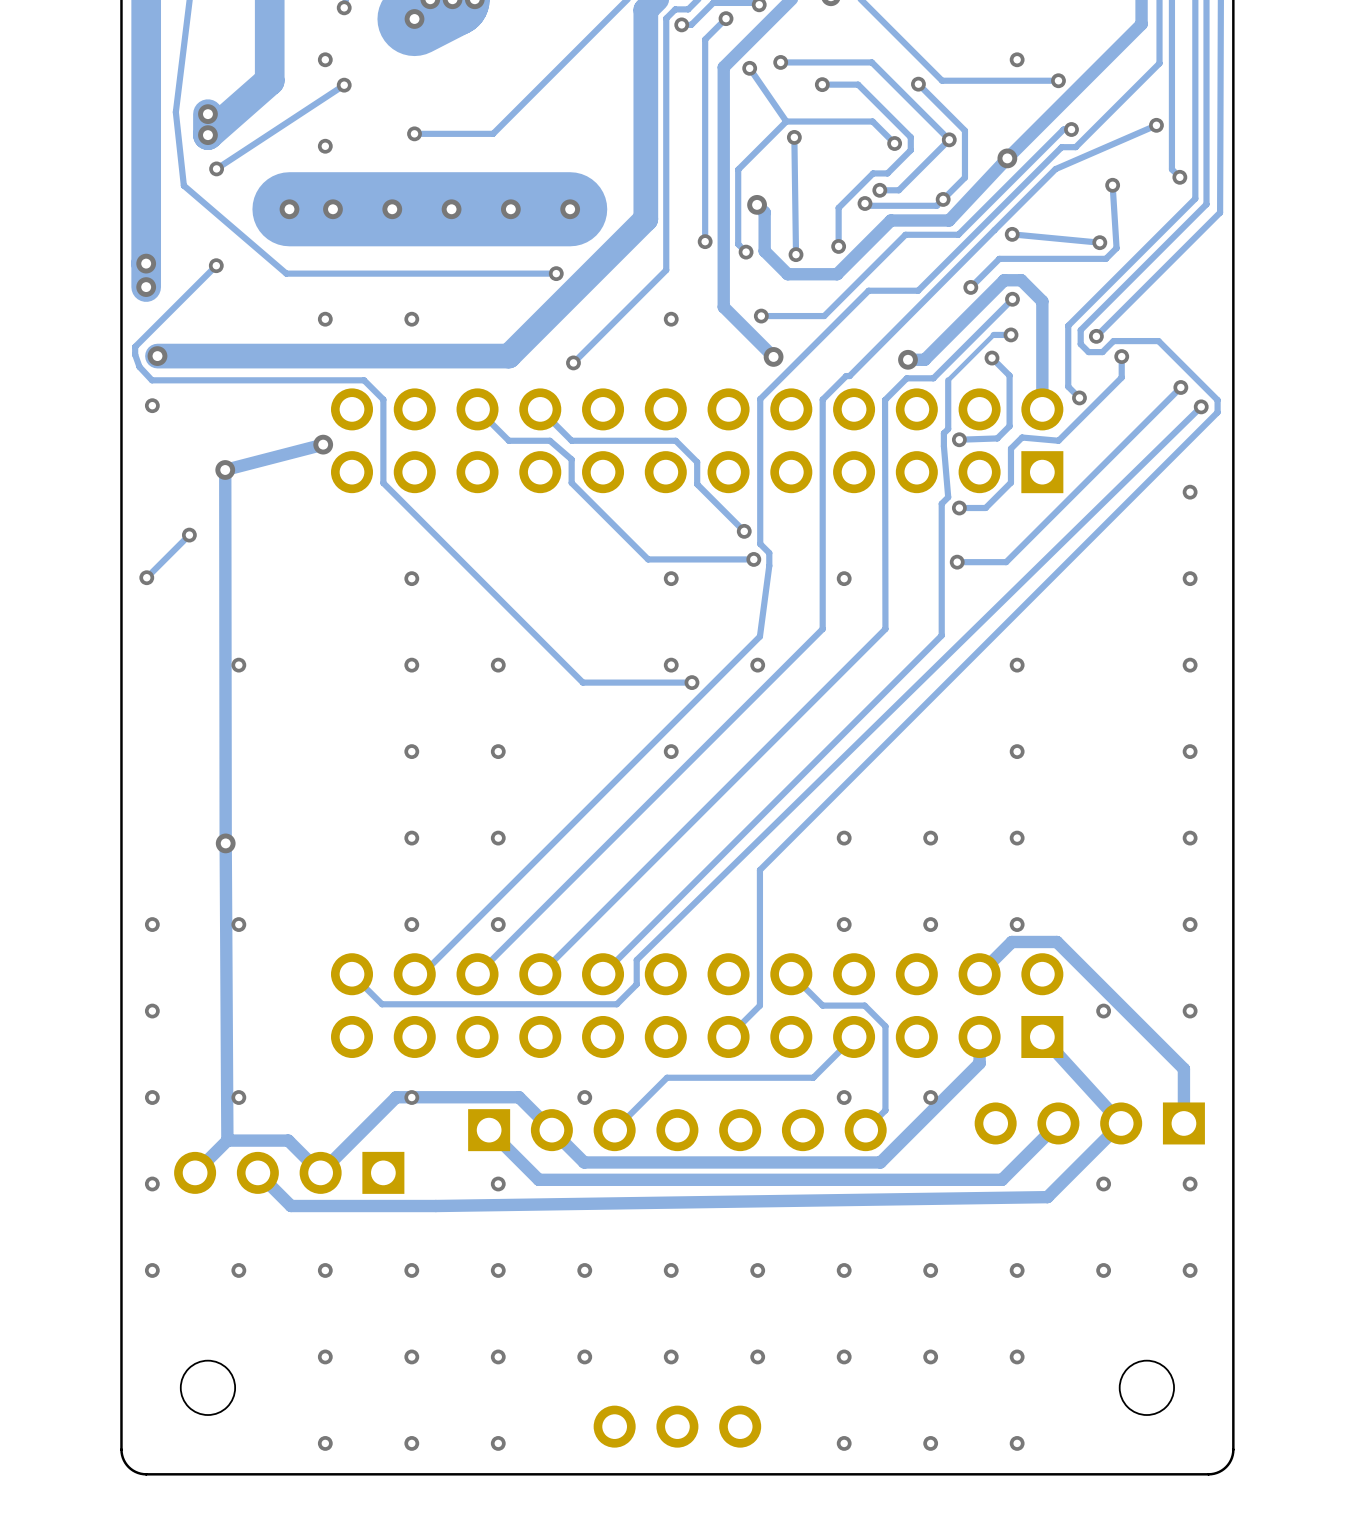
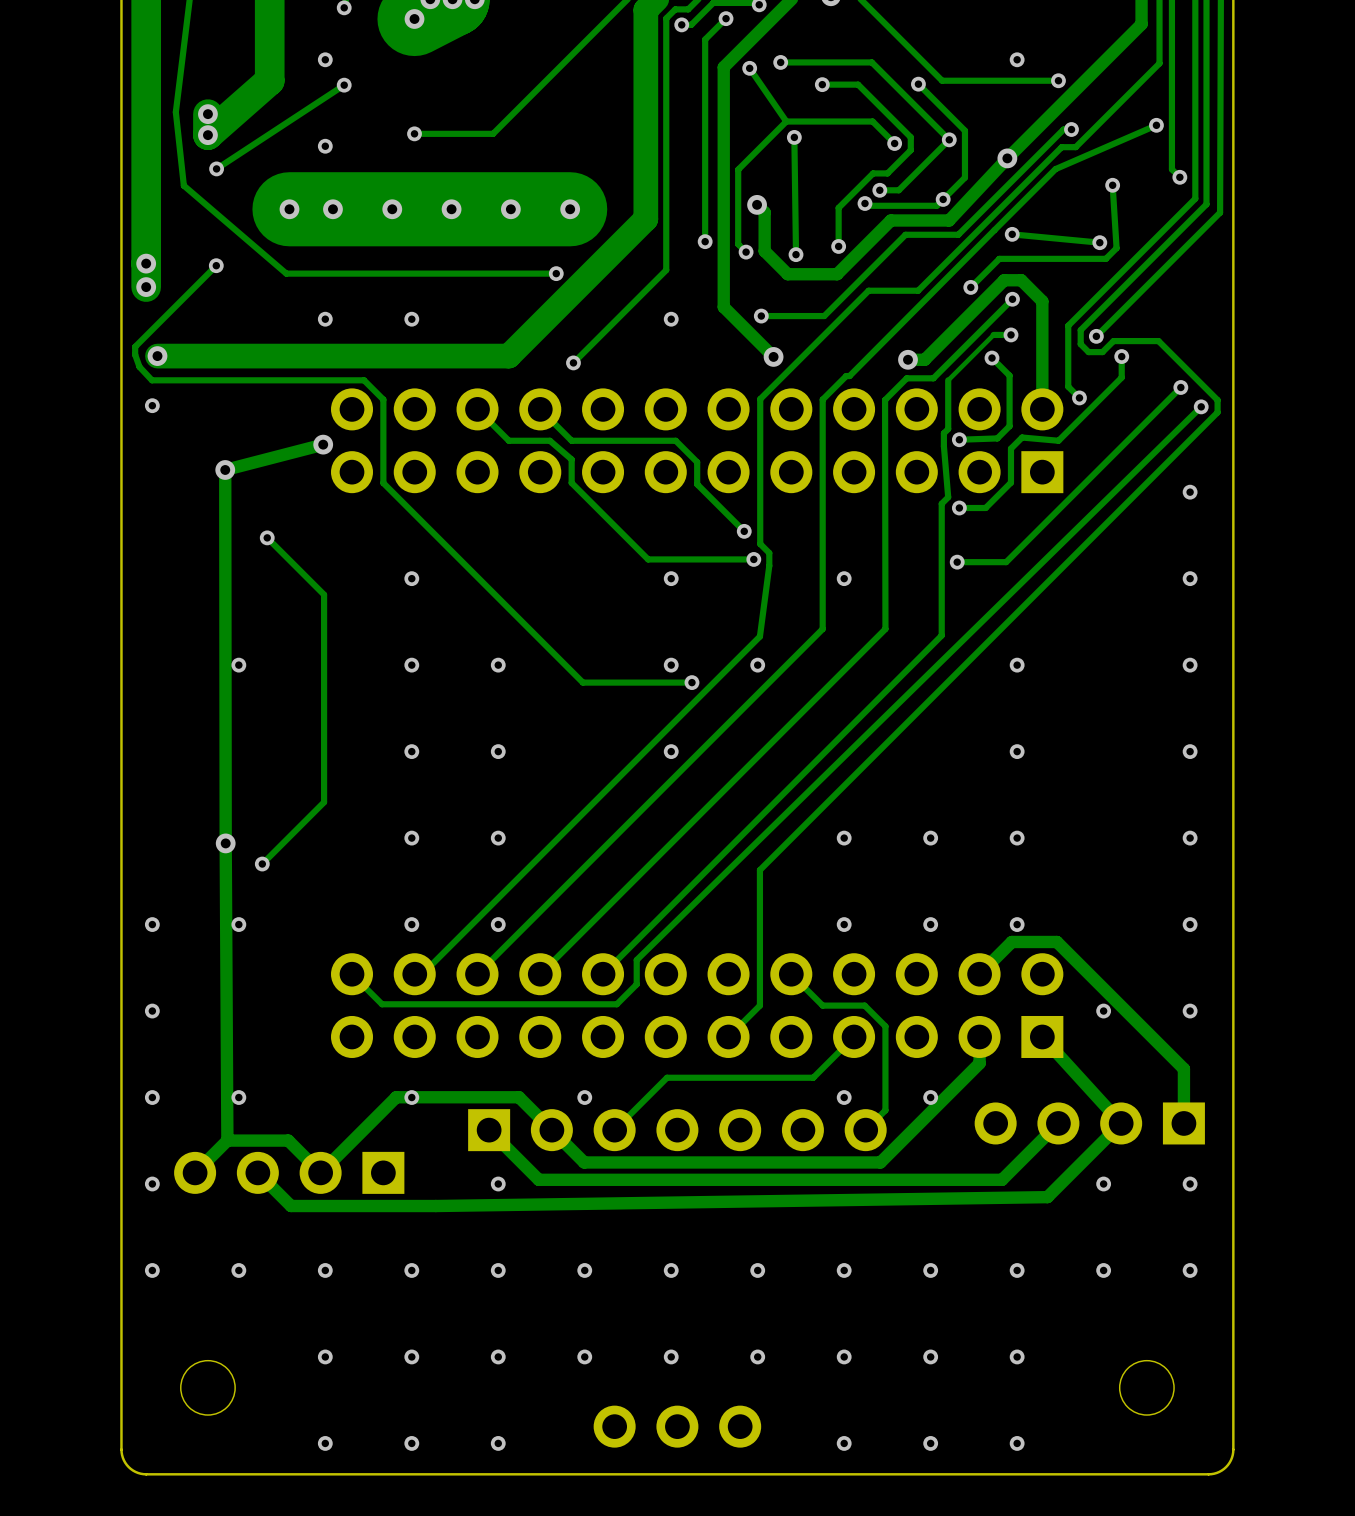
track: (189, 535) (146, 577) -> none
via: (189, 535) -> none
track: none -> (267, 537) (324, 594) (324, 802) (262, 864)
via: none -> (267, 537)
via: (146, 577) -> none
via: none -> (262, 864)

